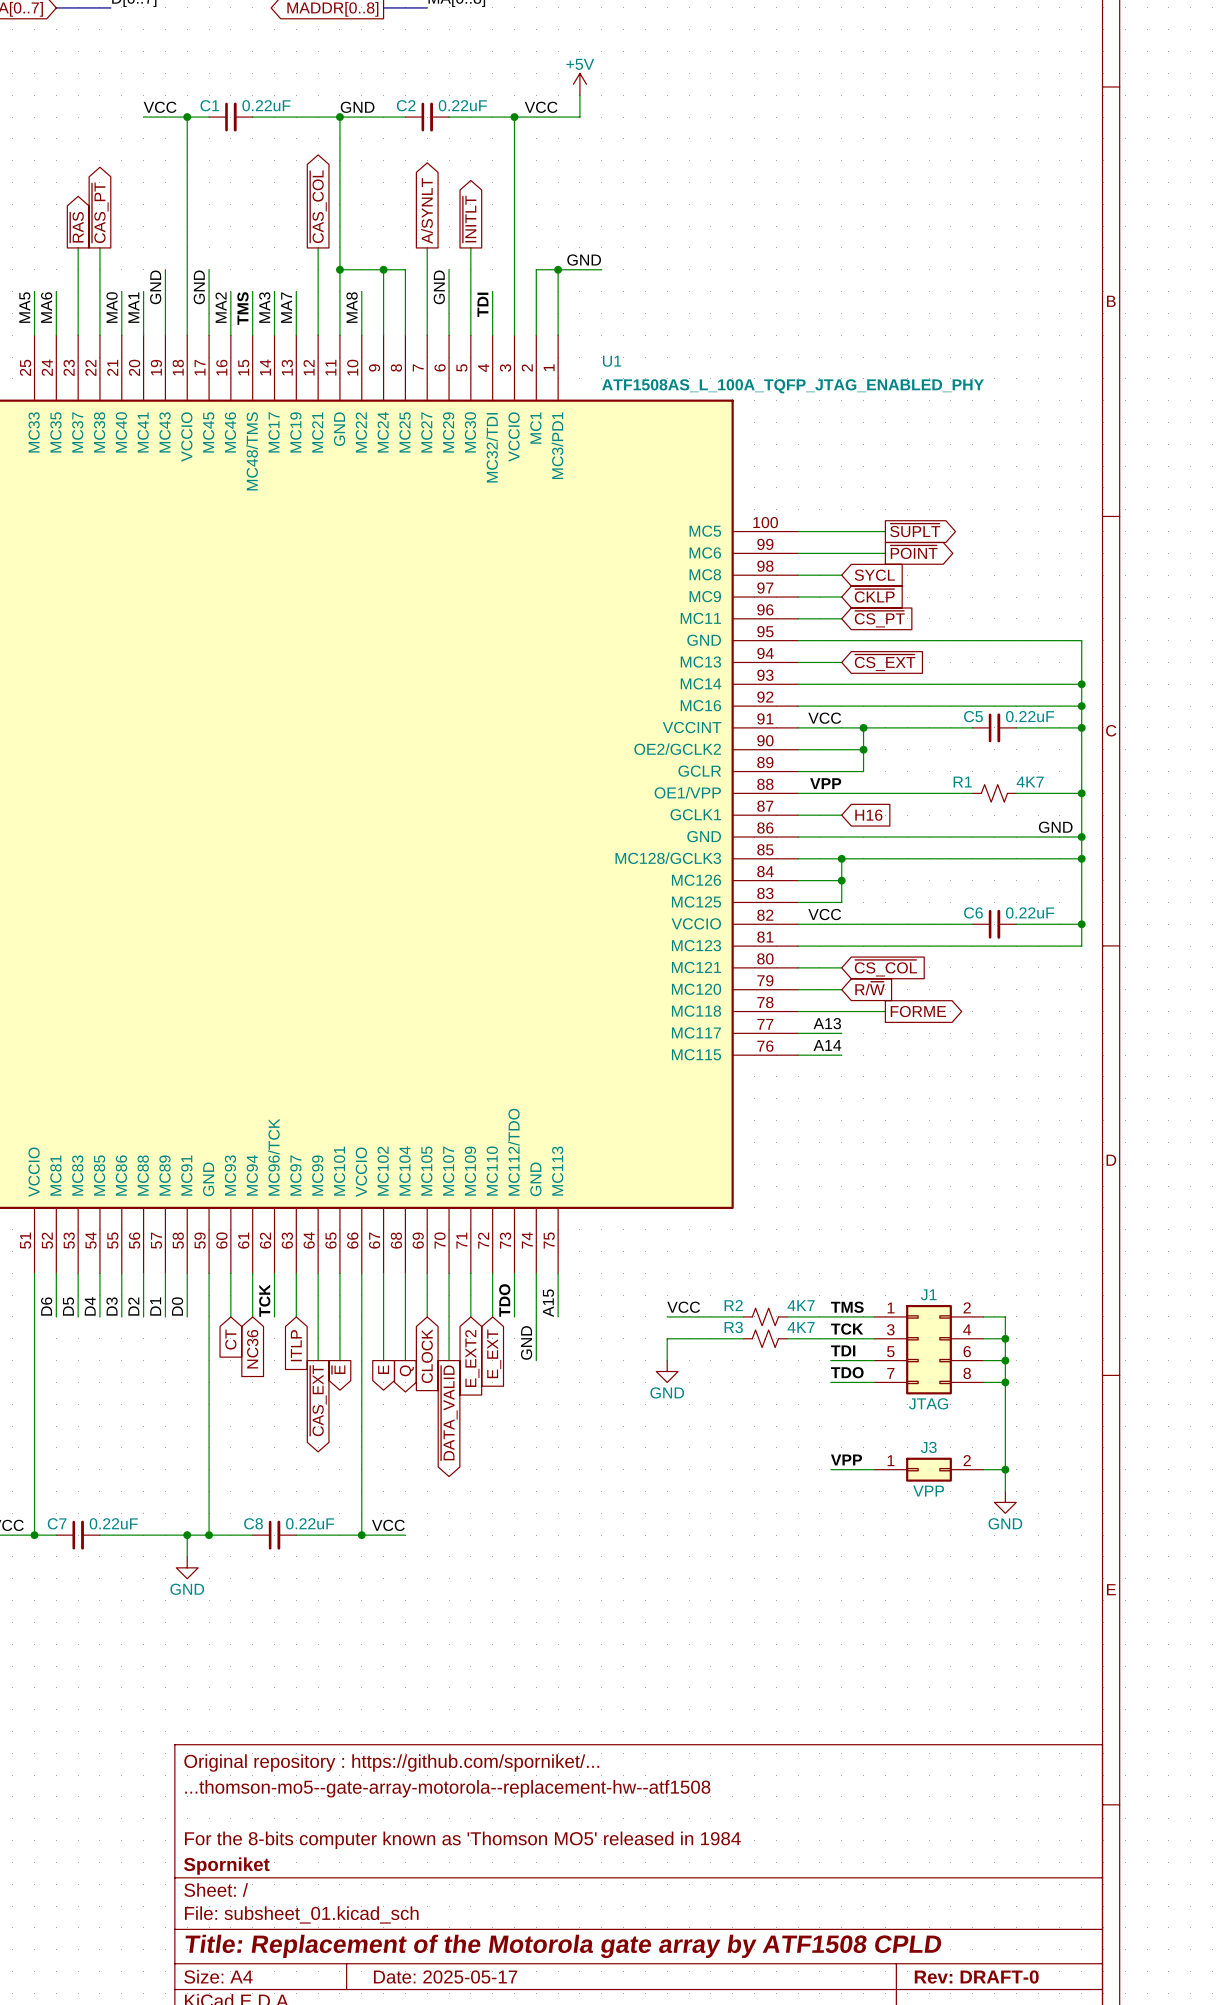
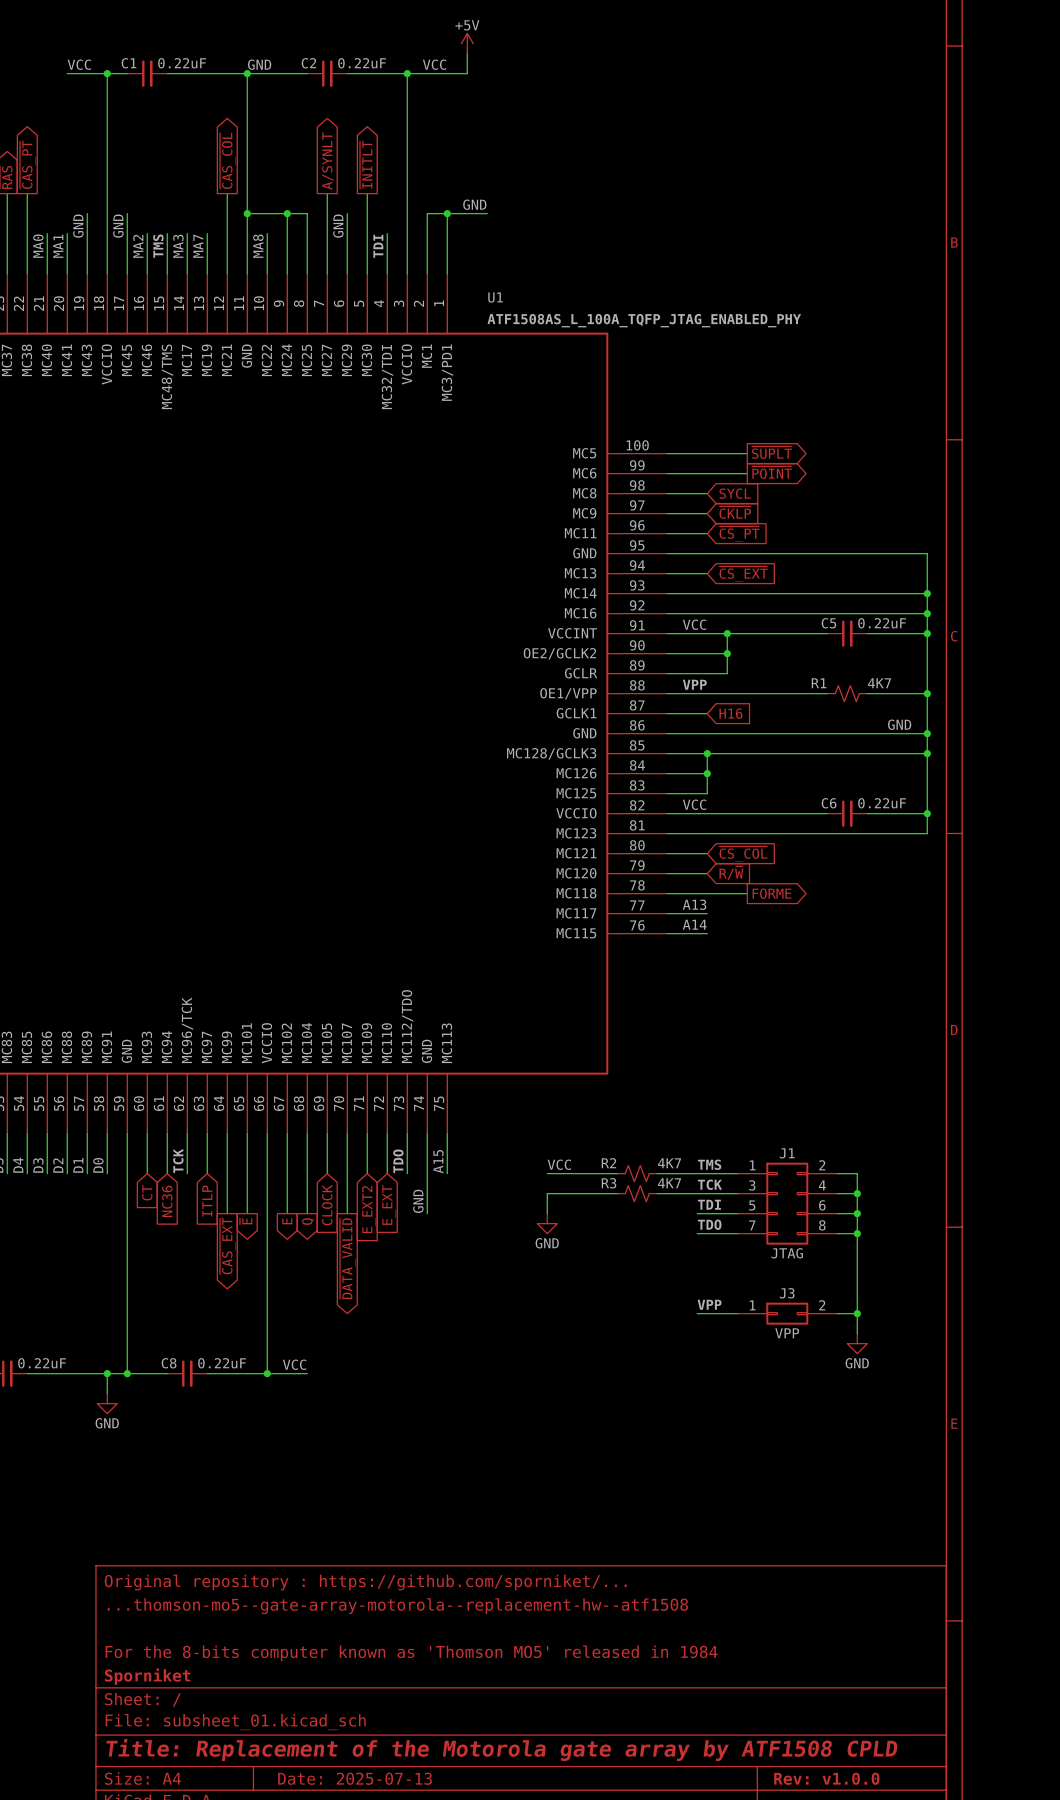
title block: Date: 2025-05-17 (445, 1977) -> Date: 2025-07-13 (355, 1778)
title block: Rev: DRAFT-0 (976, 1977) -> Rev: v1.0.0 (826, 1778)

